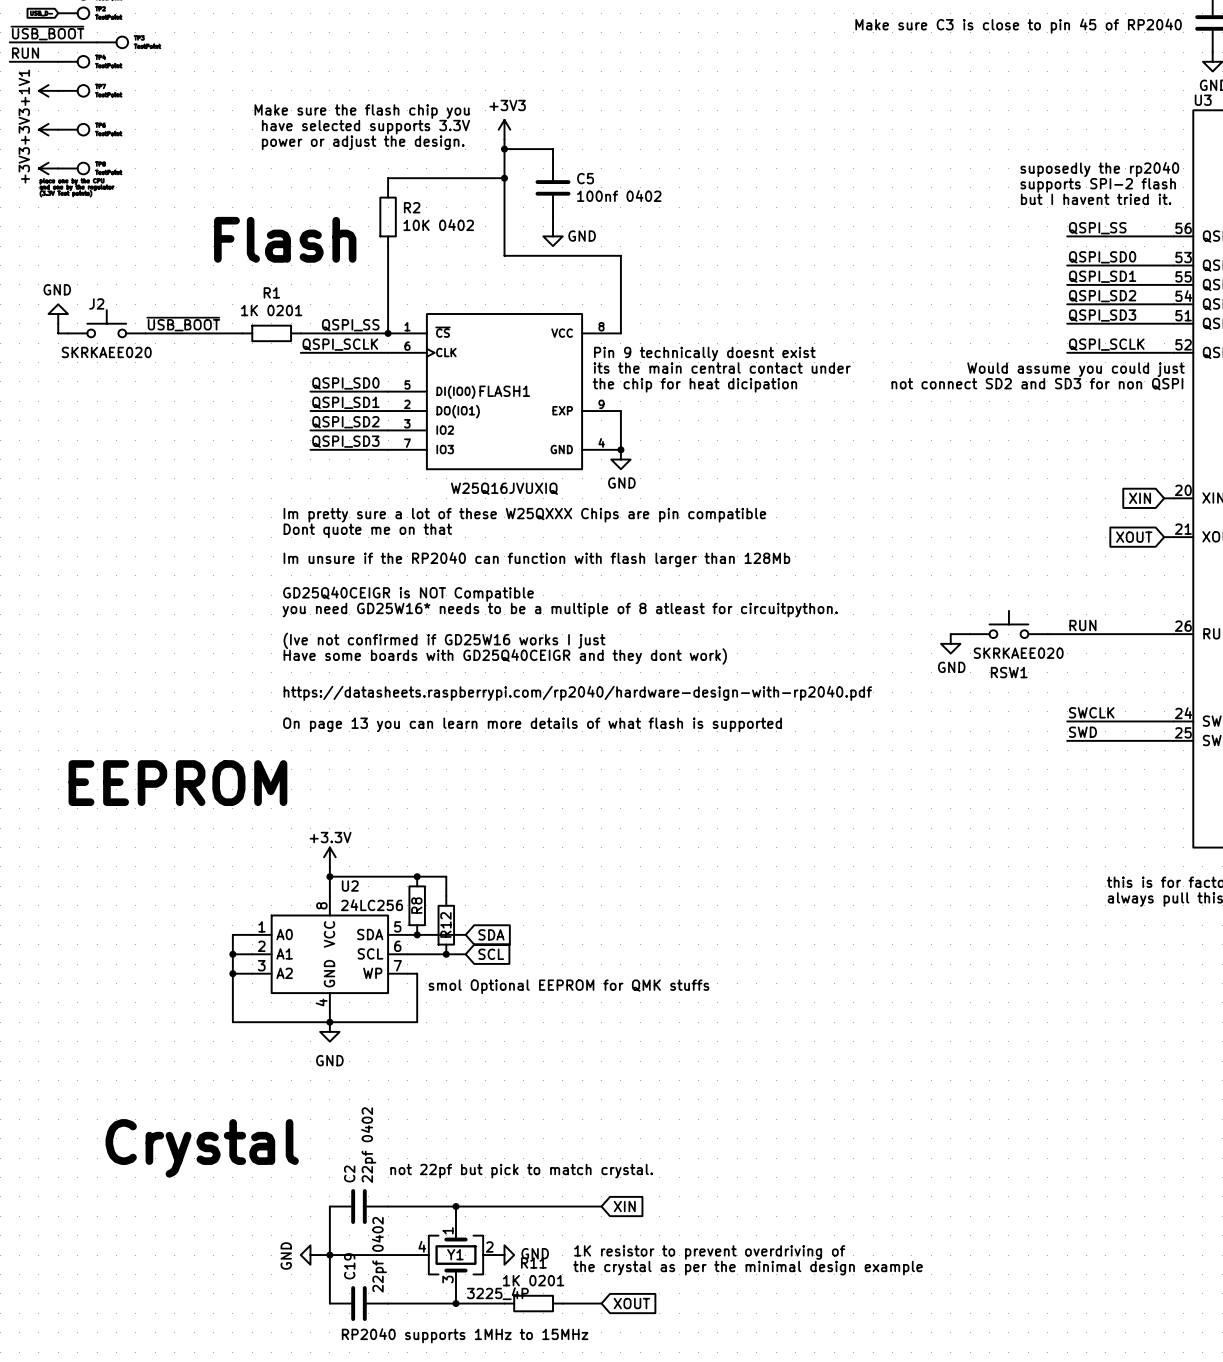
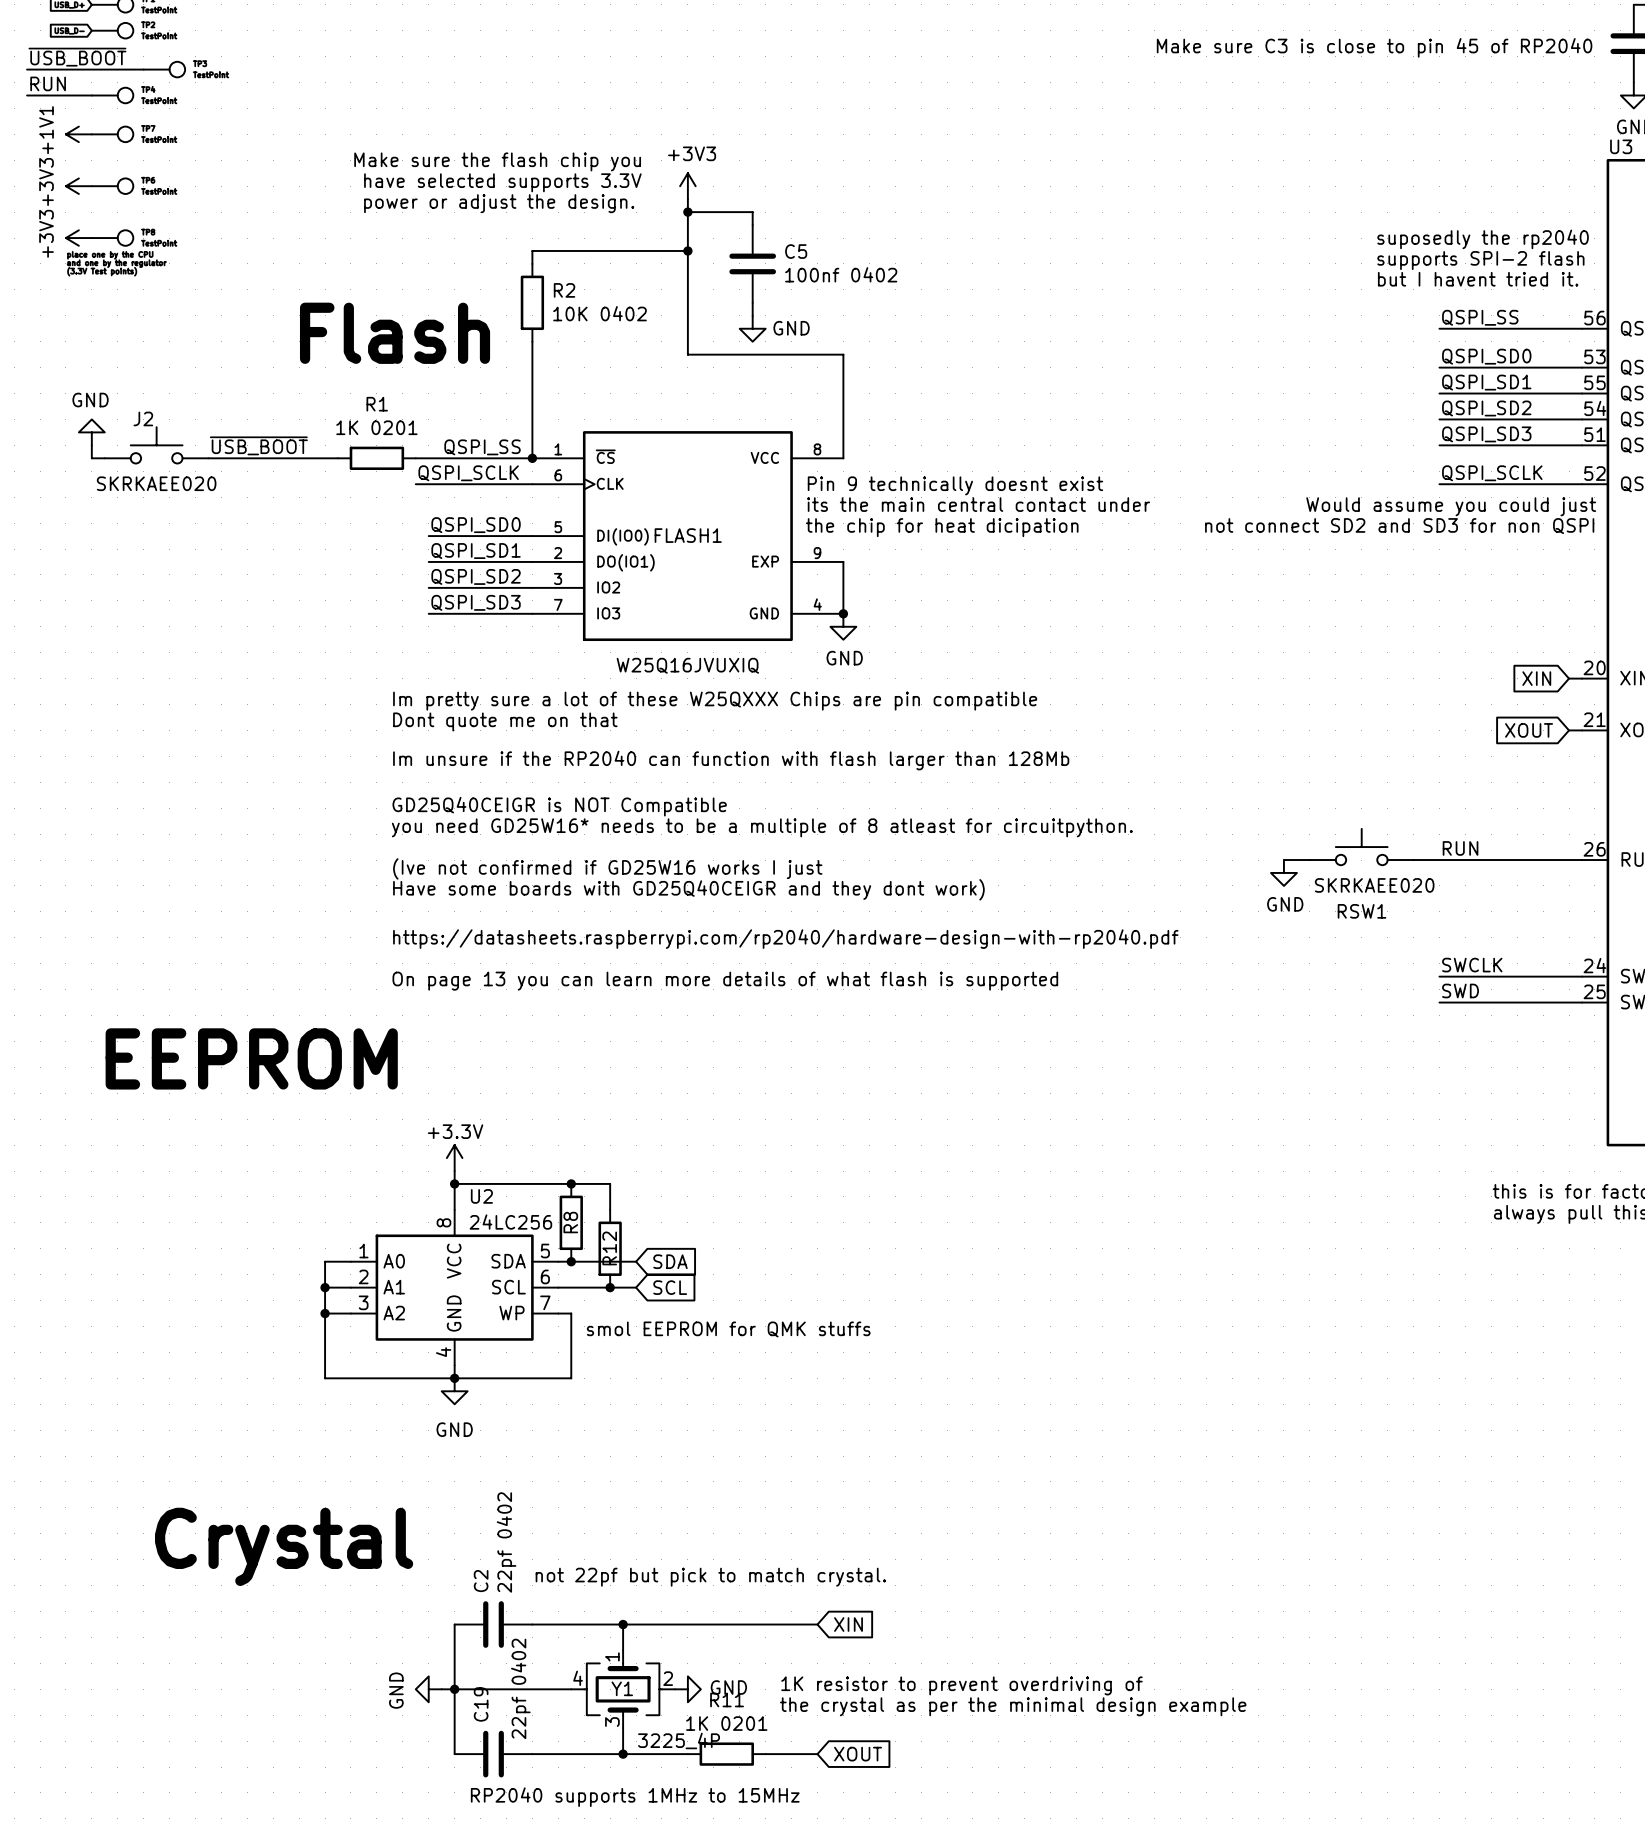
text: smol Optional EEPROM for QMK stuffs (569, 986) -> smol EEPROM for QMK stuffs (728, 1329)

